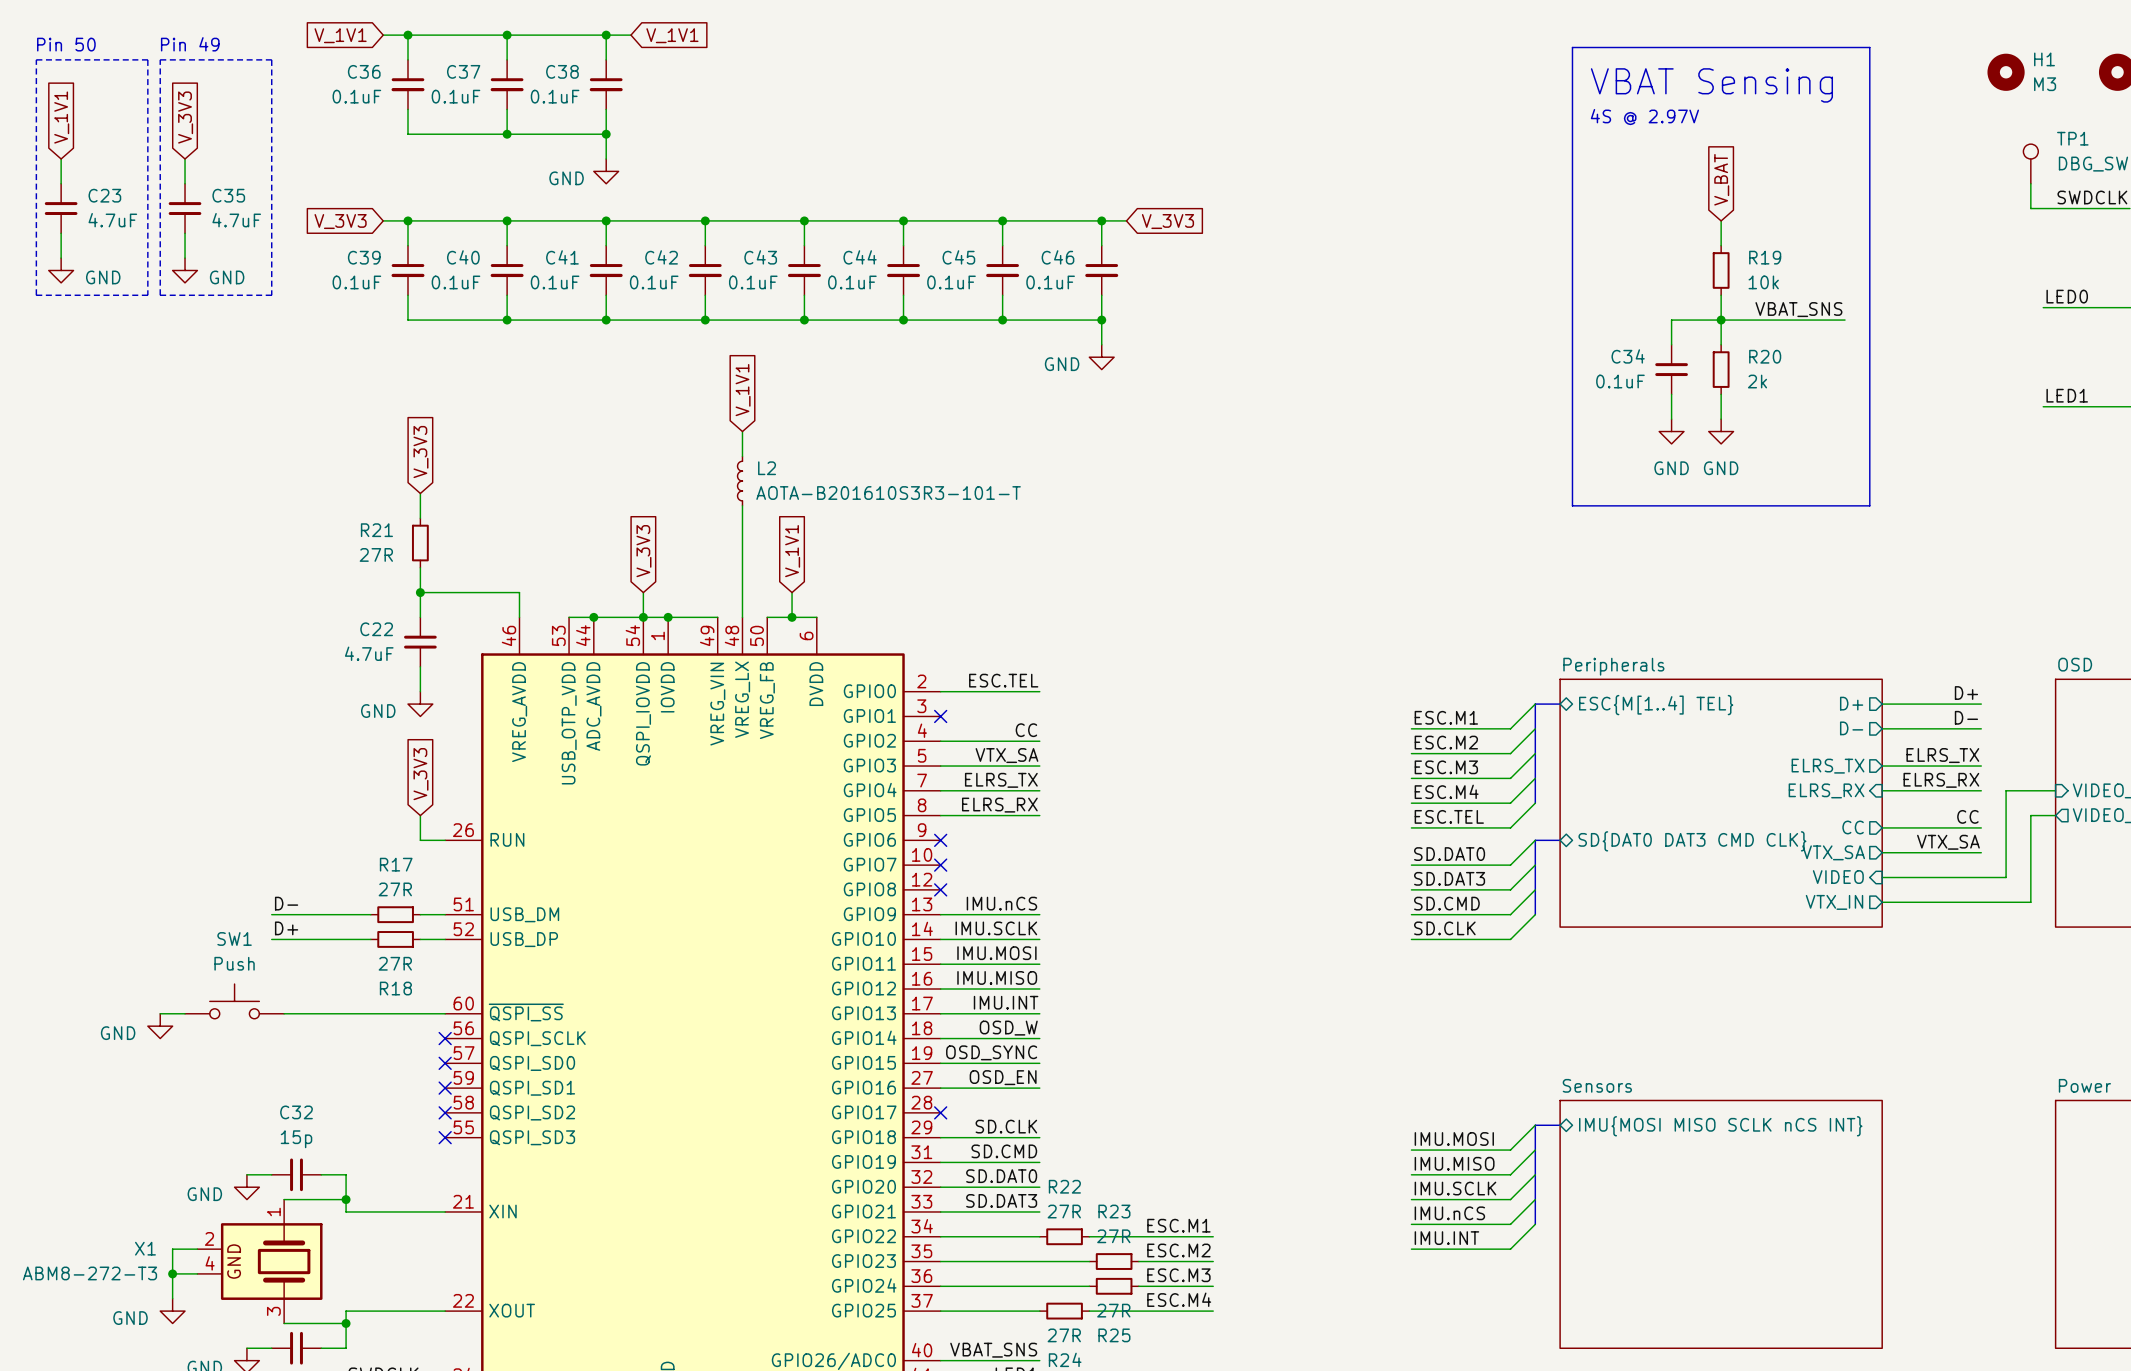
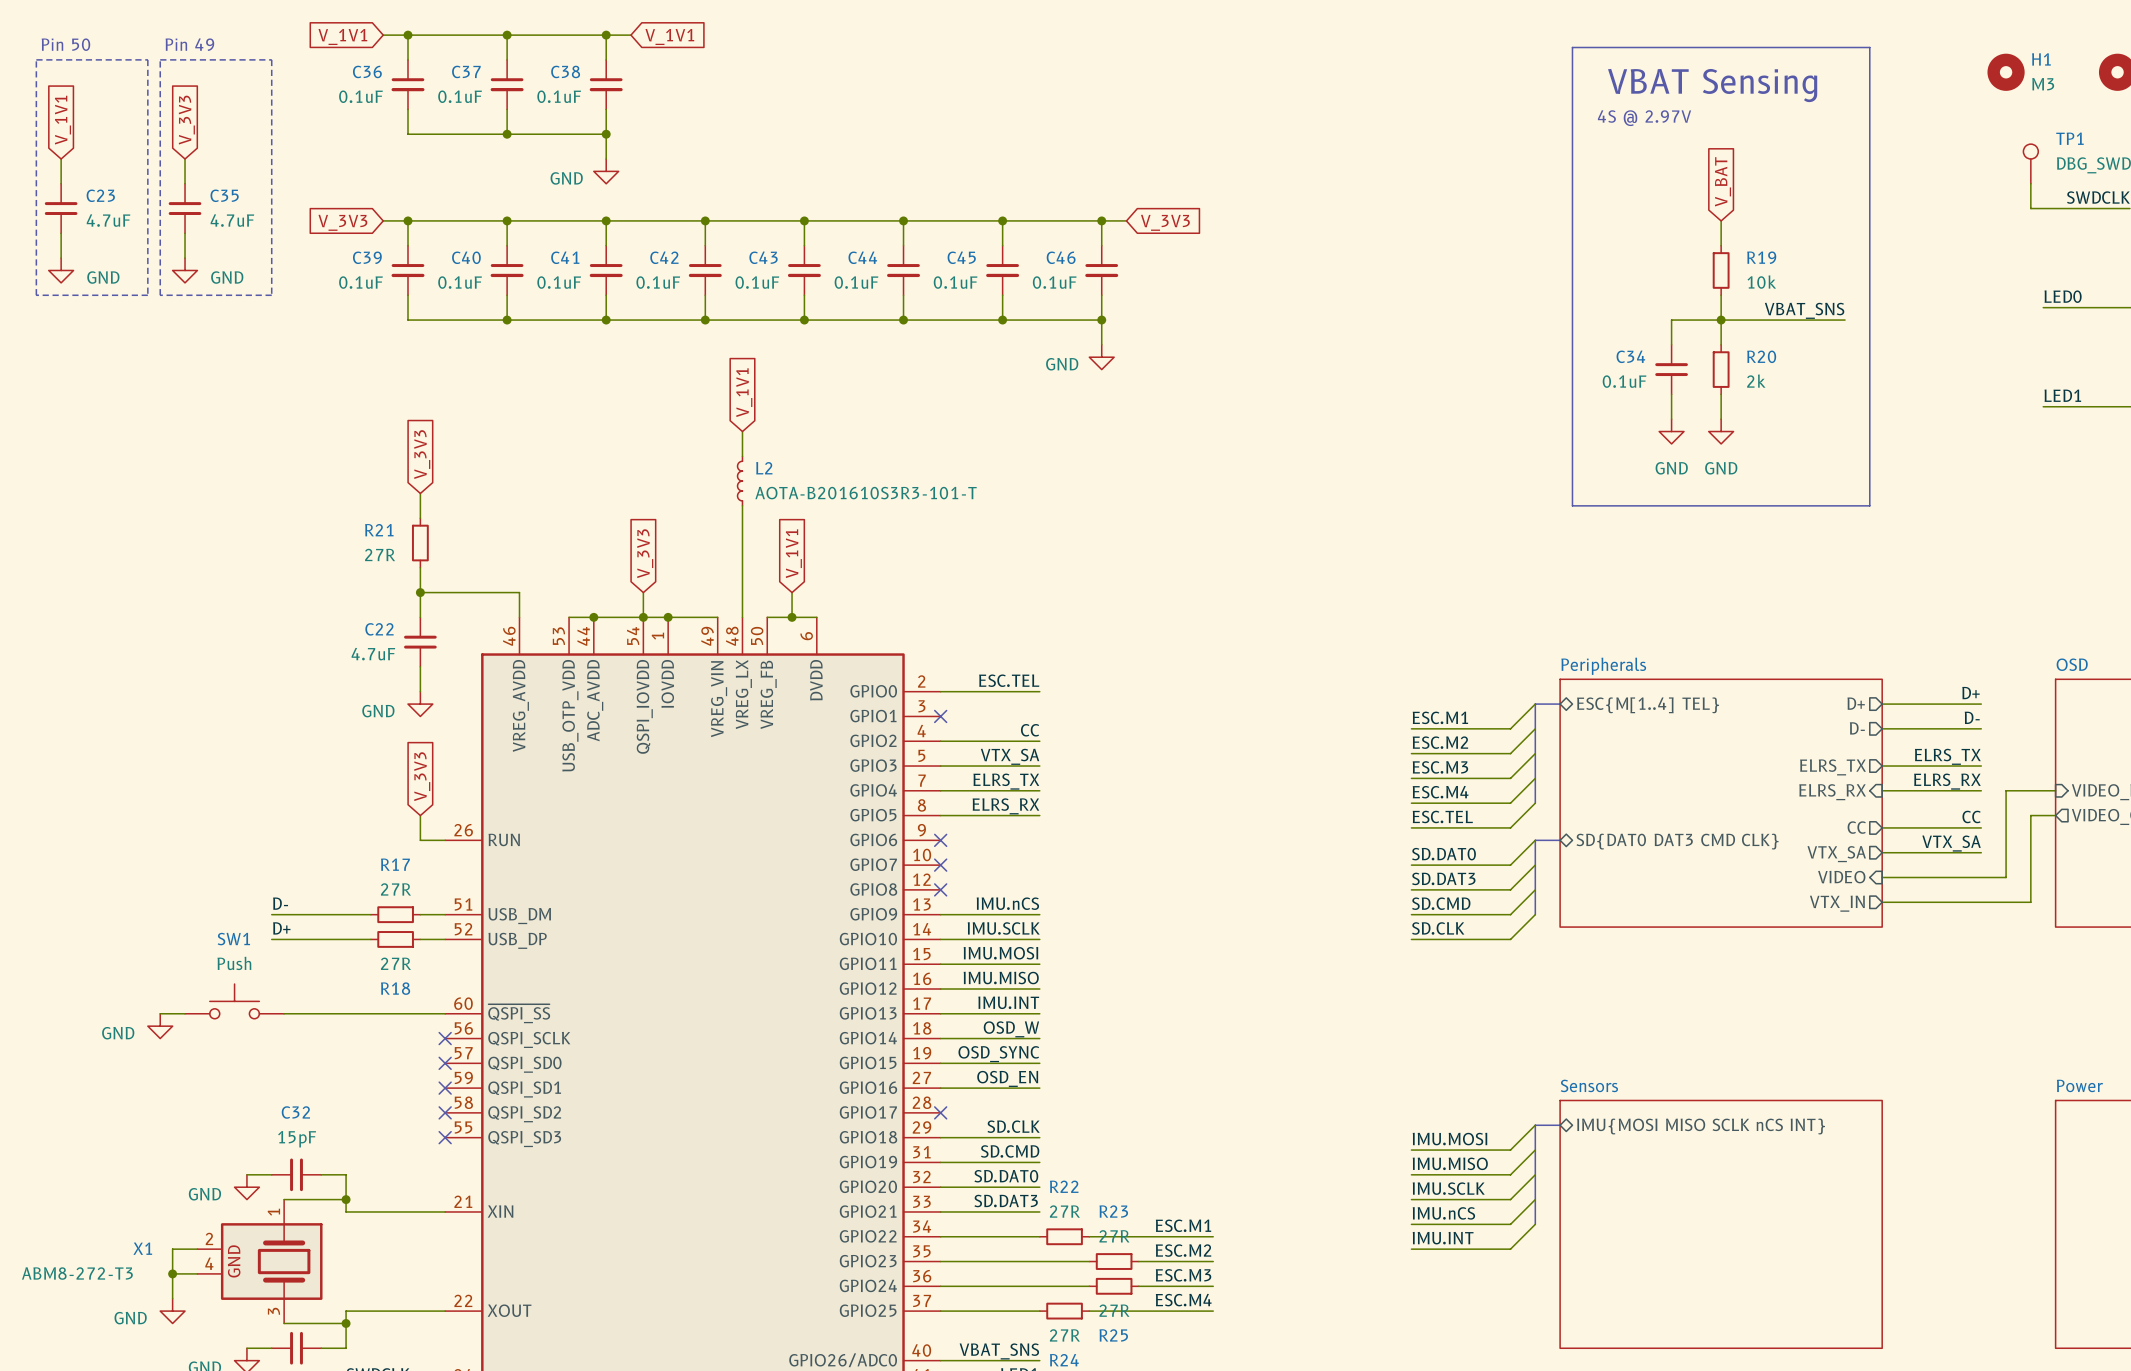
C32 value: 15p (296, 1139) -> 15pF (297, 1139)

